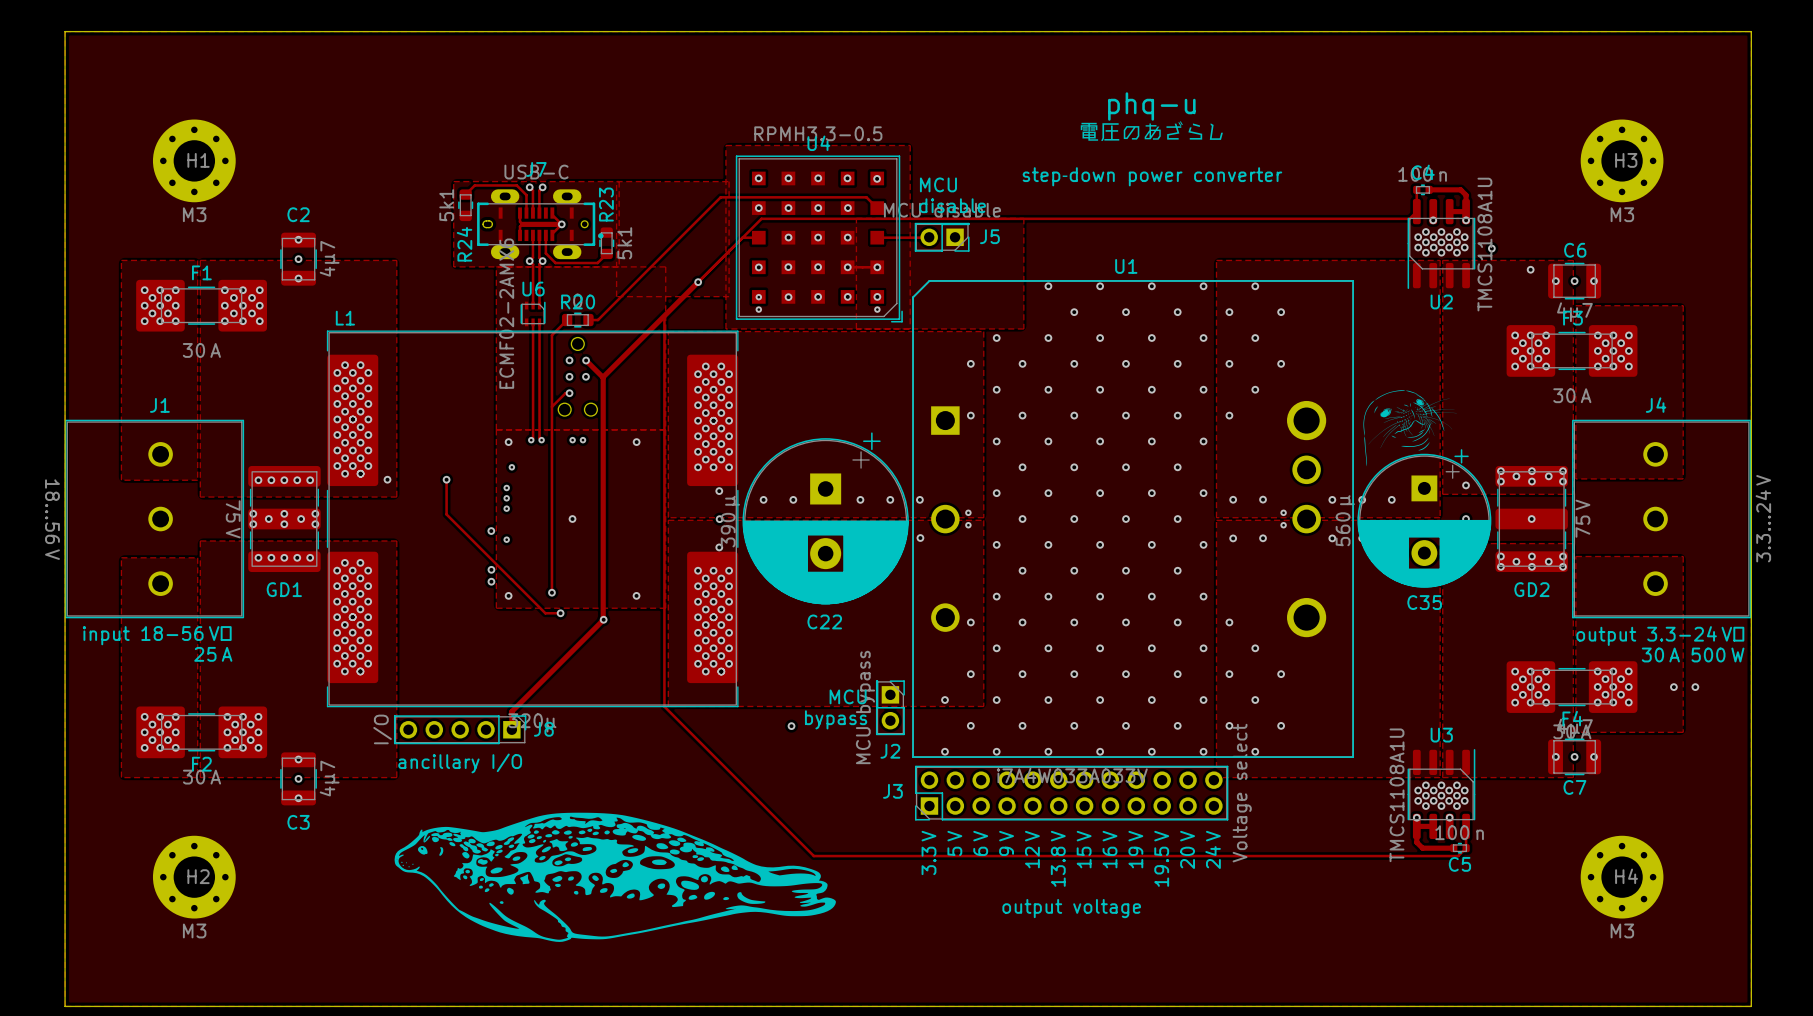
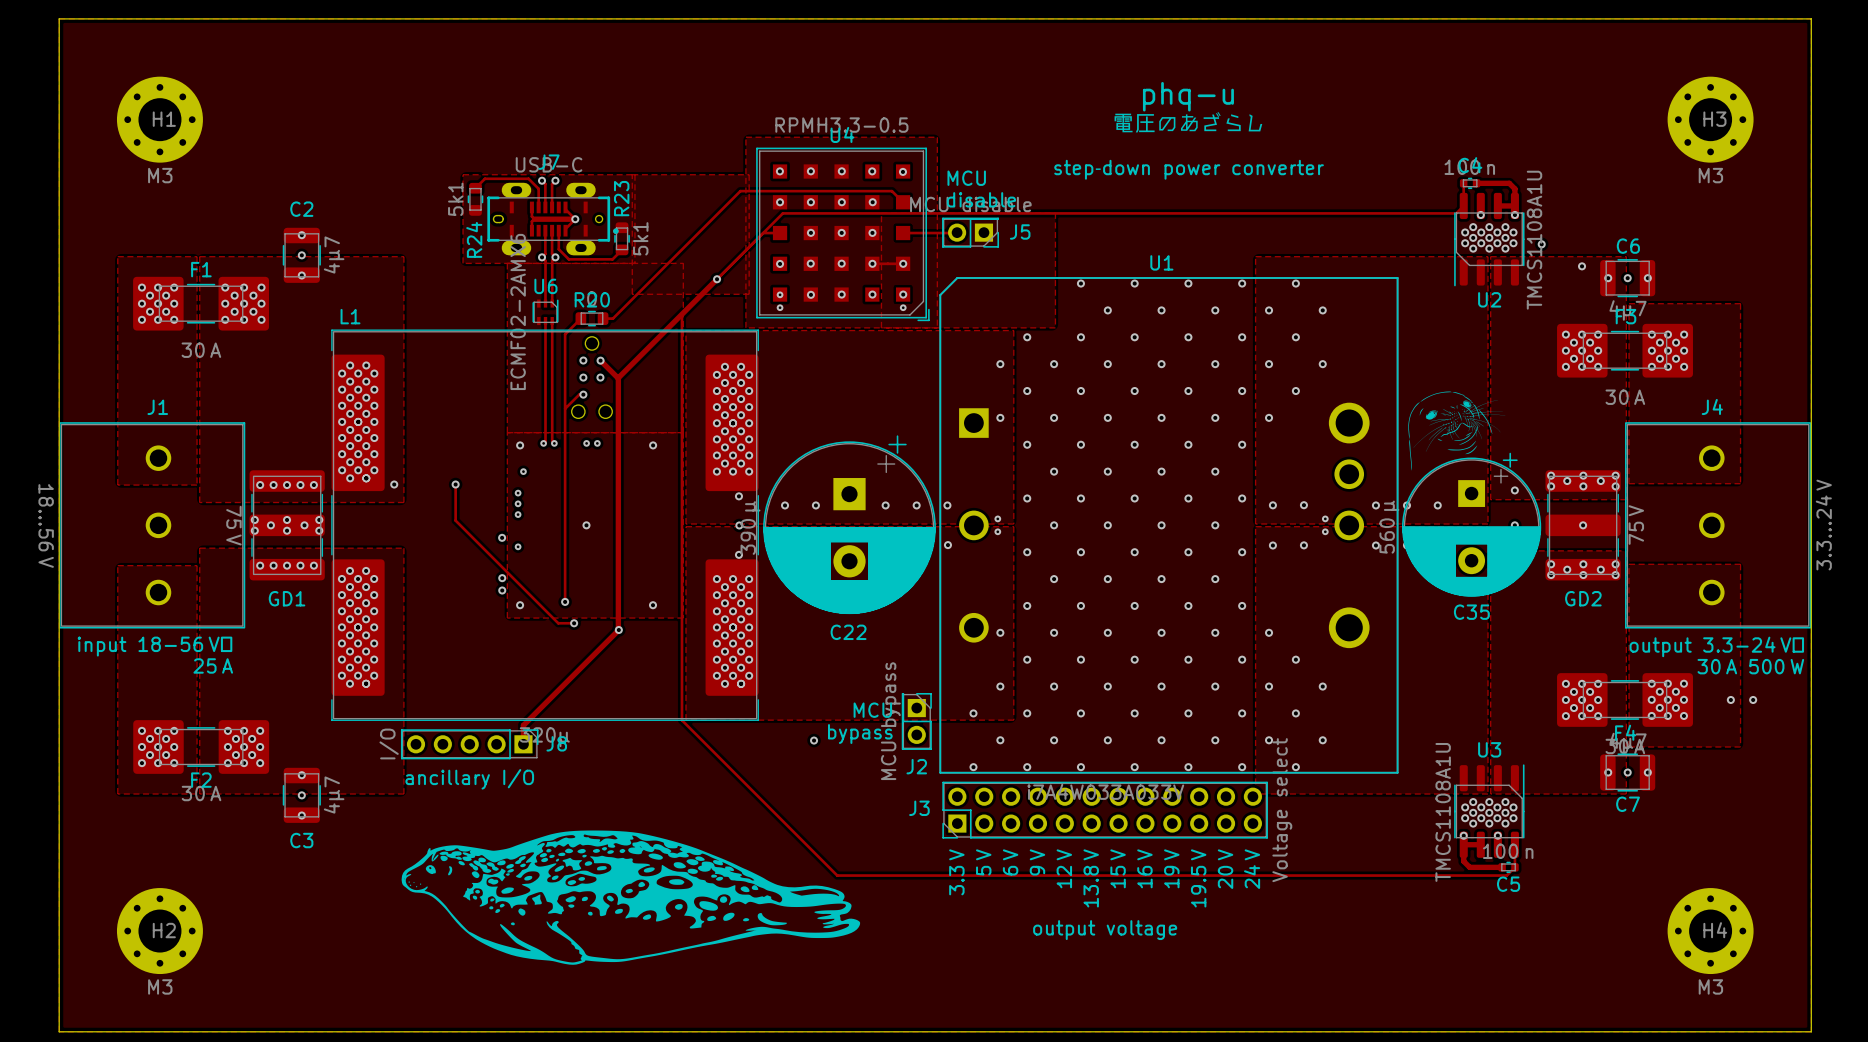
H1 position: (194, 160) -> (159, 119)
H3 position: (1622, 160) -> (1710, 119)
H2 position: (194, 877) -> (159, 931)
H4 position: (1622, 877) -> (1710, 931)

